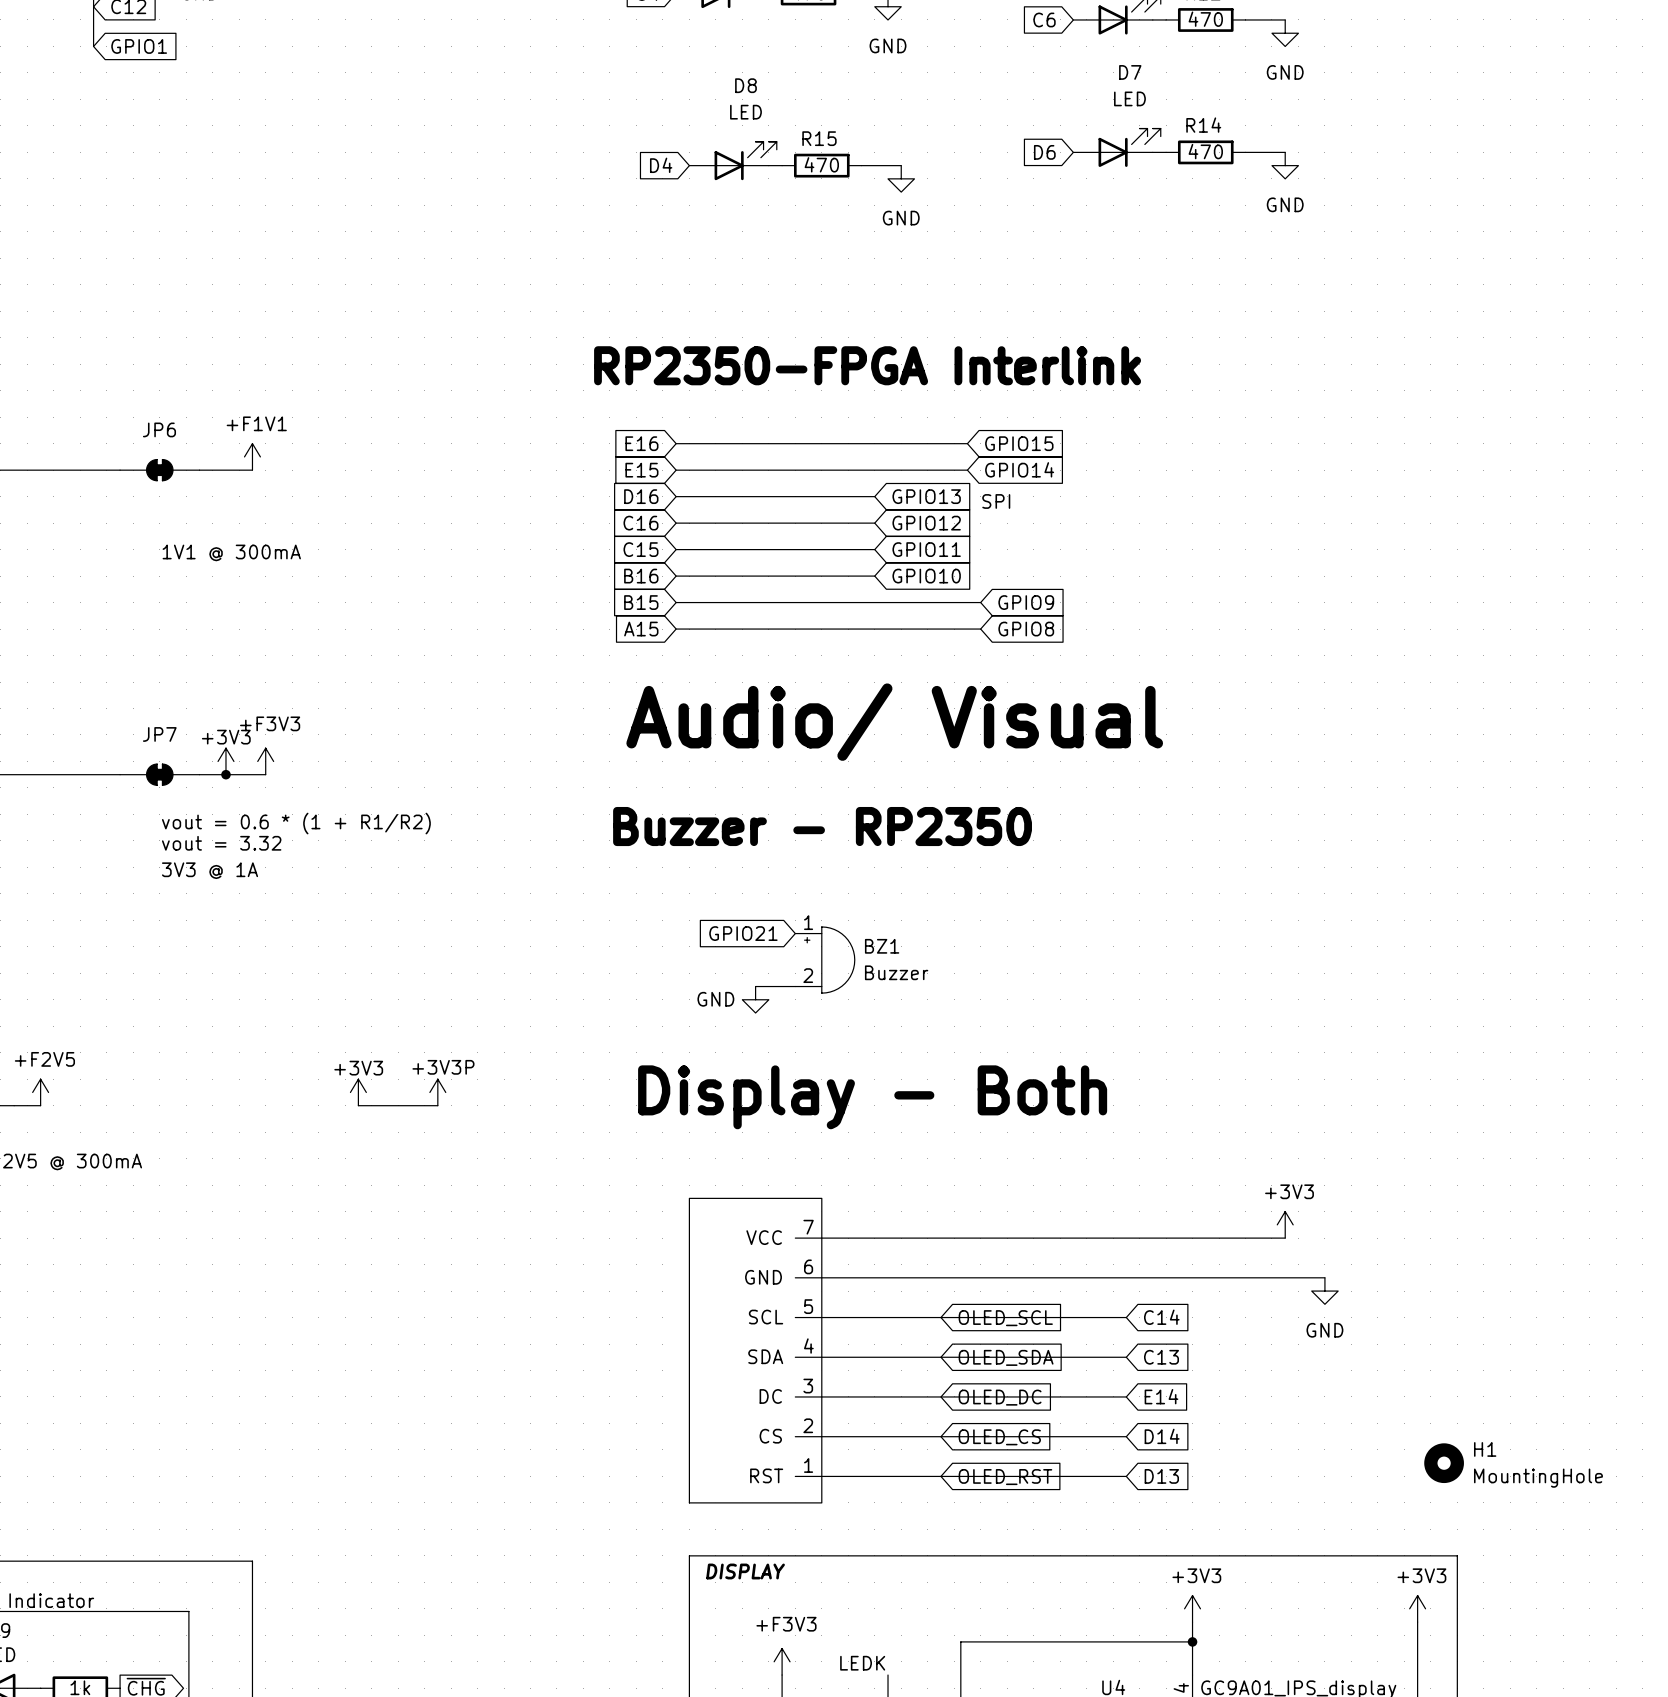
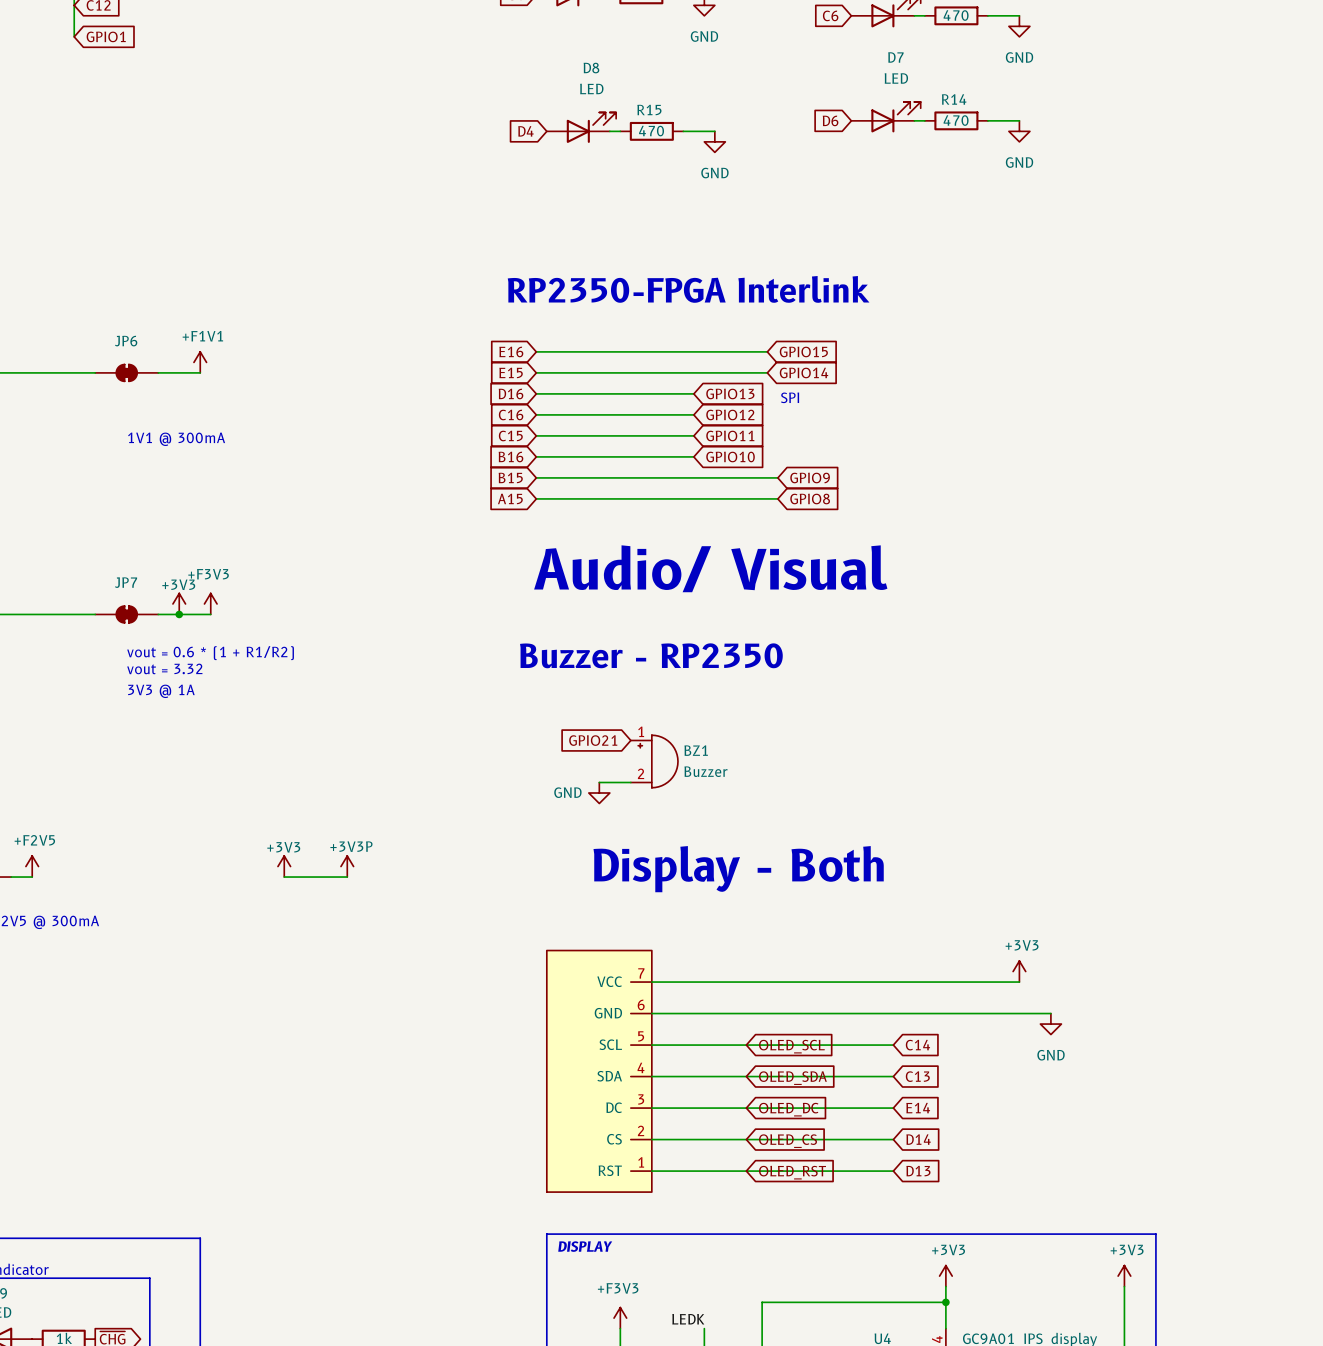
H1: MountingHole (1444, 1463) -> none

